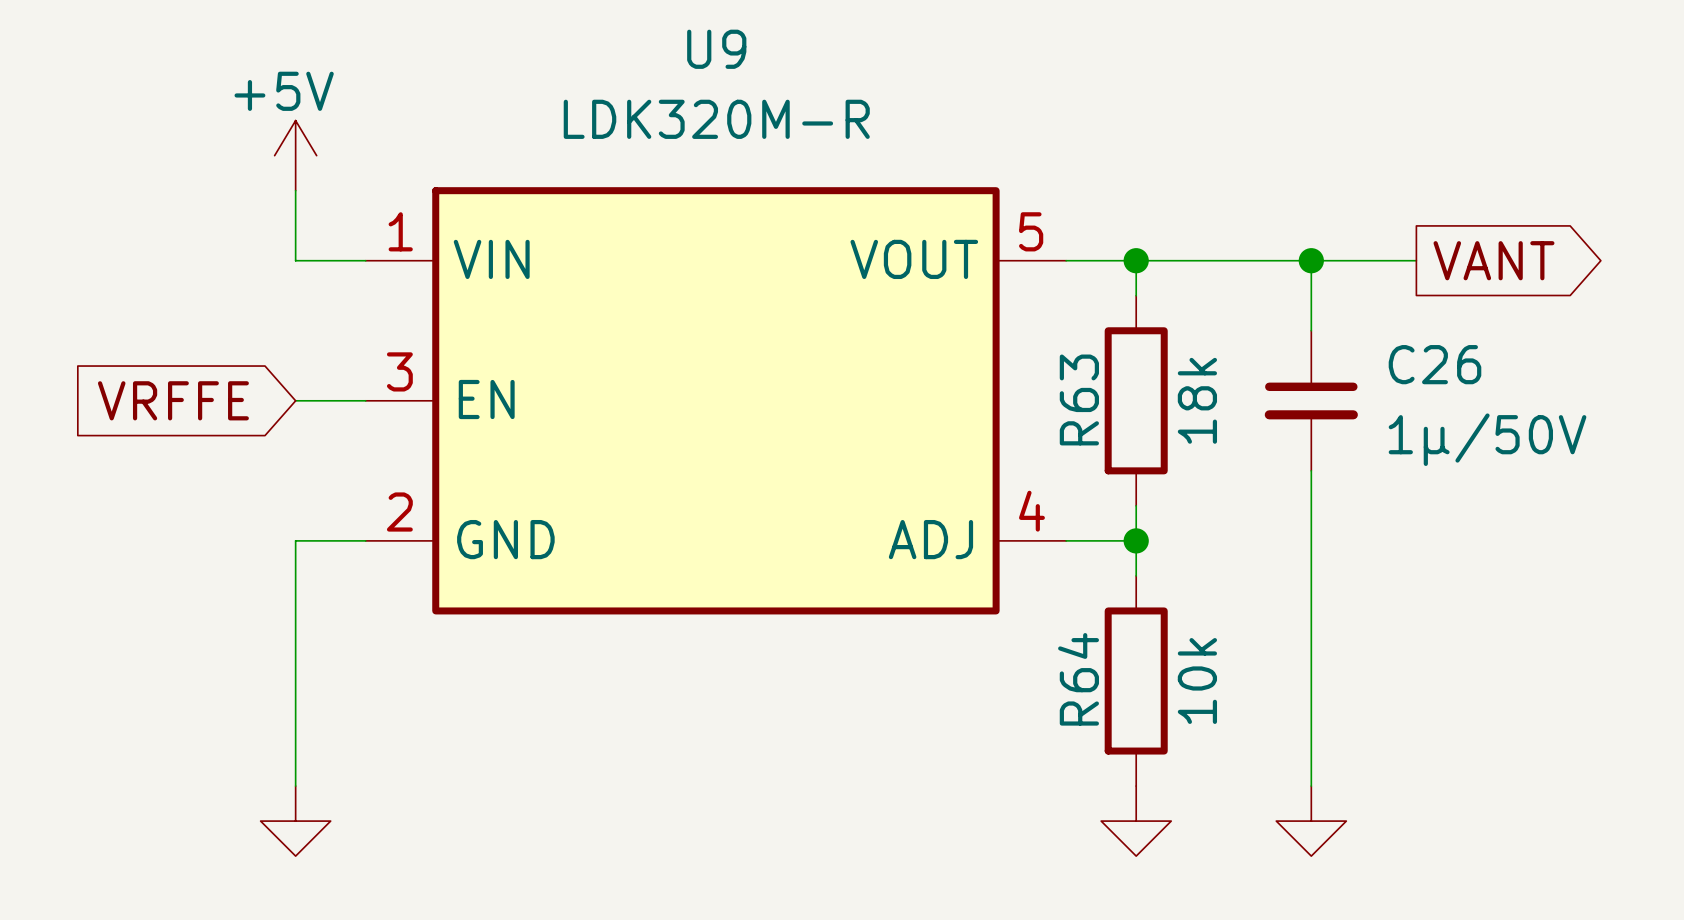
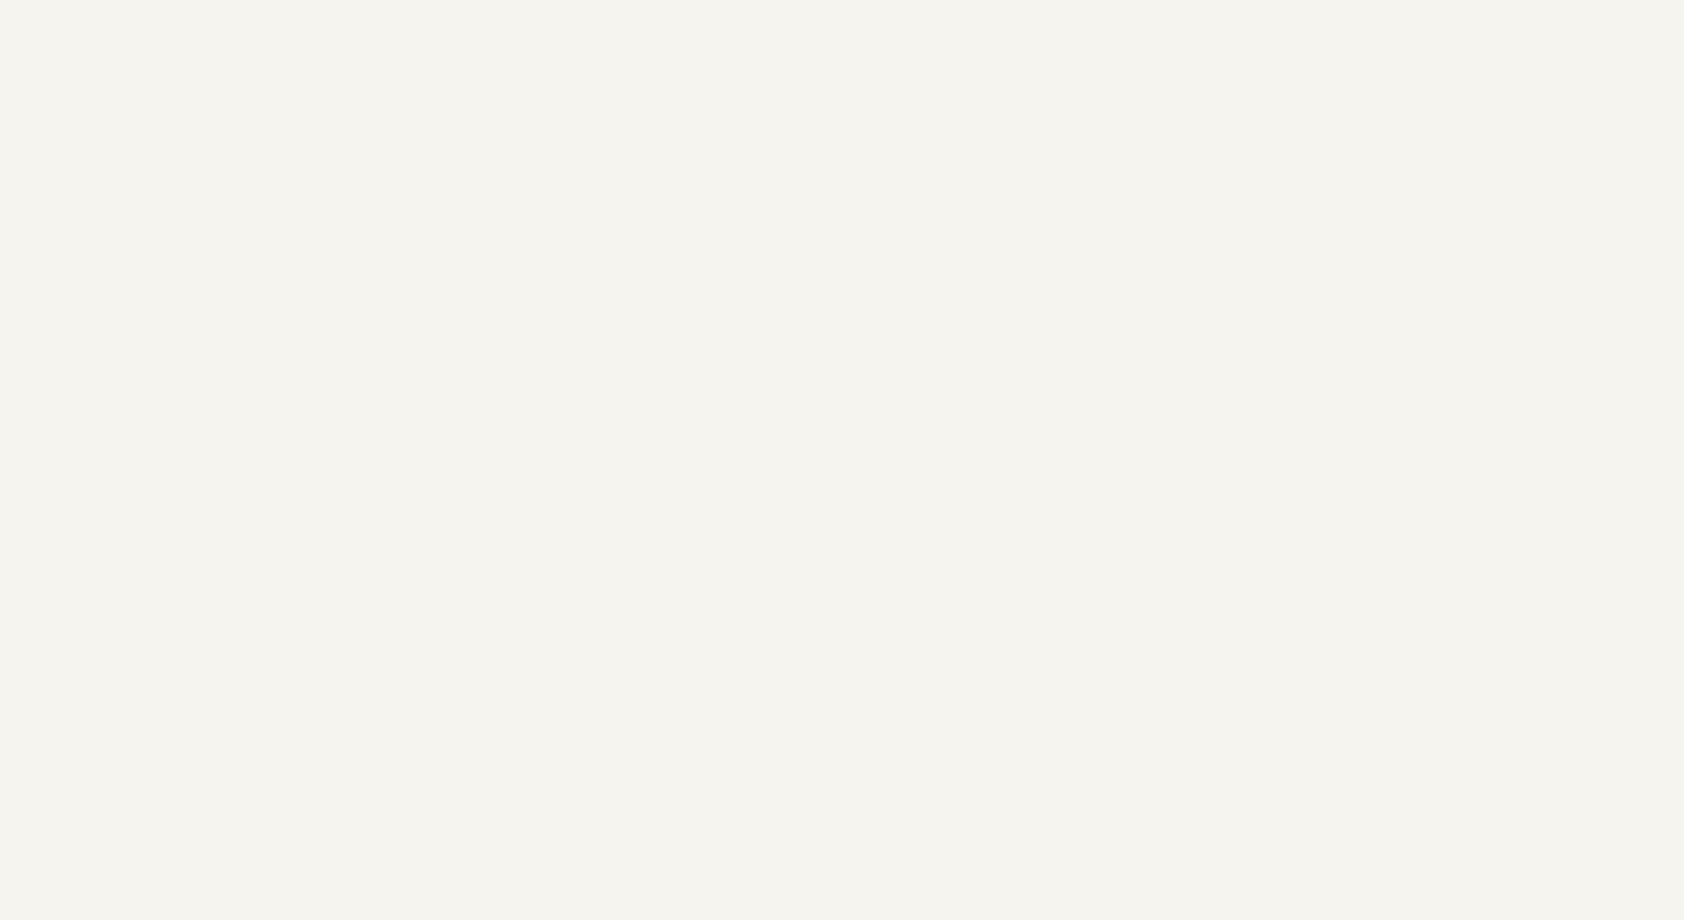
power symbol: +5V (295, 155) -> none
wire: (295, 190) (295, 260) (365, 260) -> none
wire: (1066, 260) (1416, 260) -> none
wire: (1136, 260) (1136, 295) -> none
junction: (1136, 260) -> none
wire: (1311, 260) (1311, 330) -> none
junction: (1311, 260) -> none
global label: VANT (1493, 260) -> none
global label: VRFFE (173, 400) -> none
wire: (295, 400) (365, 400) -> none
U9: LDK320M-R (715, 400) -> none
R63: 18k (1136, 400) -> none
C26: 1μ/50V (1311, 400) -> none
wire: (1311, 470) (1311, 786) -> none
wire: (1136, 505) (1136, 575) -> none
wire: (365, 540) (295, 540) (295, 786) -> none
wire: (1066, 540) (1136, 540) -> none
junction: (1136, 540) -> none
R64: 10k (1136, 680) -> none
power symbol: (295, 821) -> none
power symbol: (1136, 821) -> none
power symbol: (1311, 821) -> none

